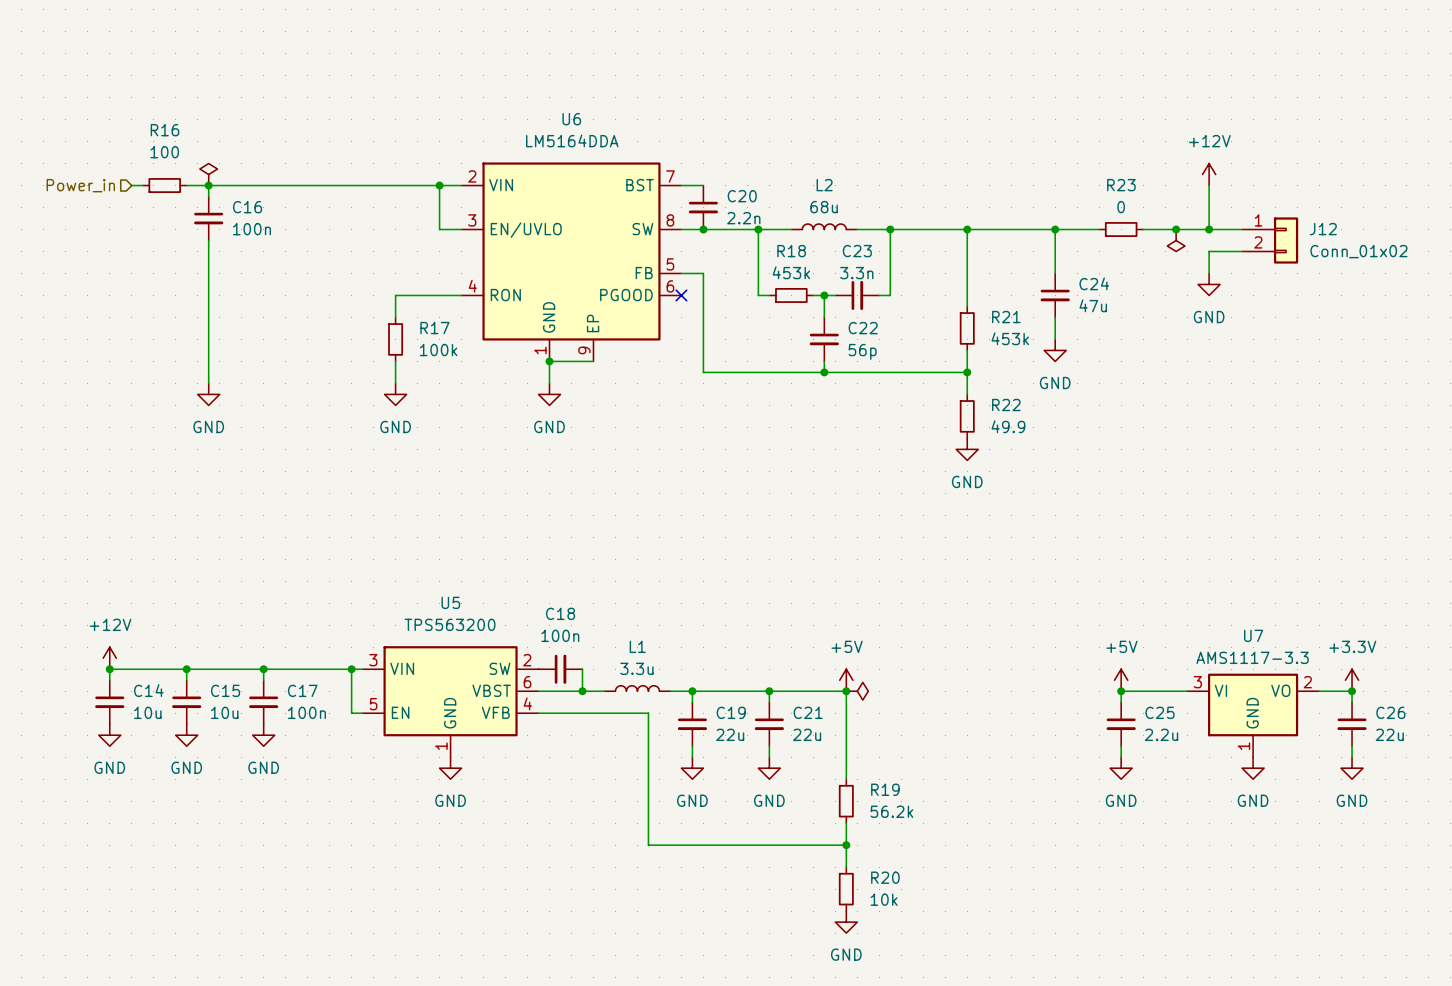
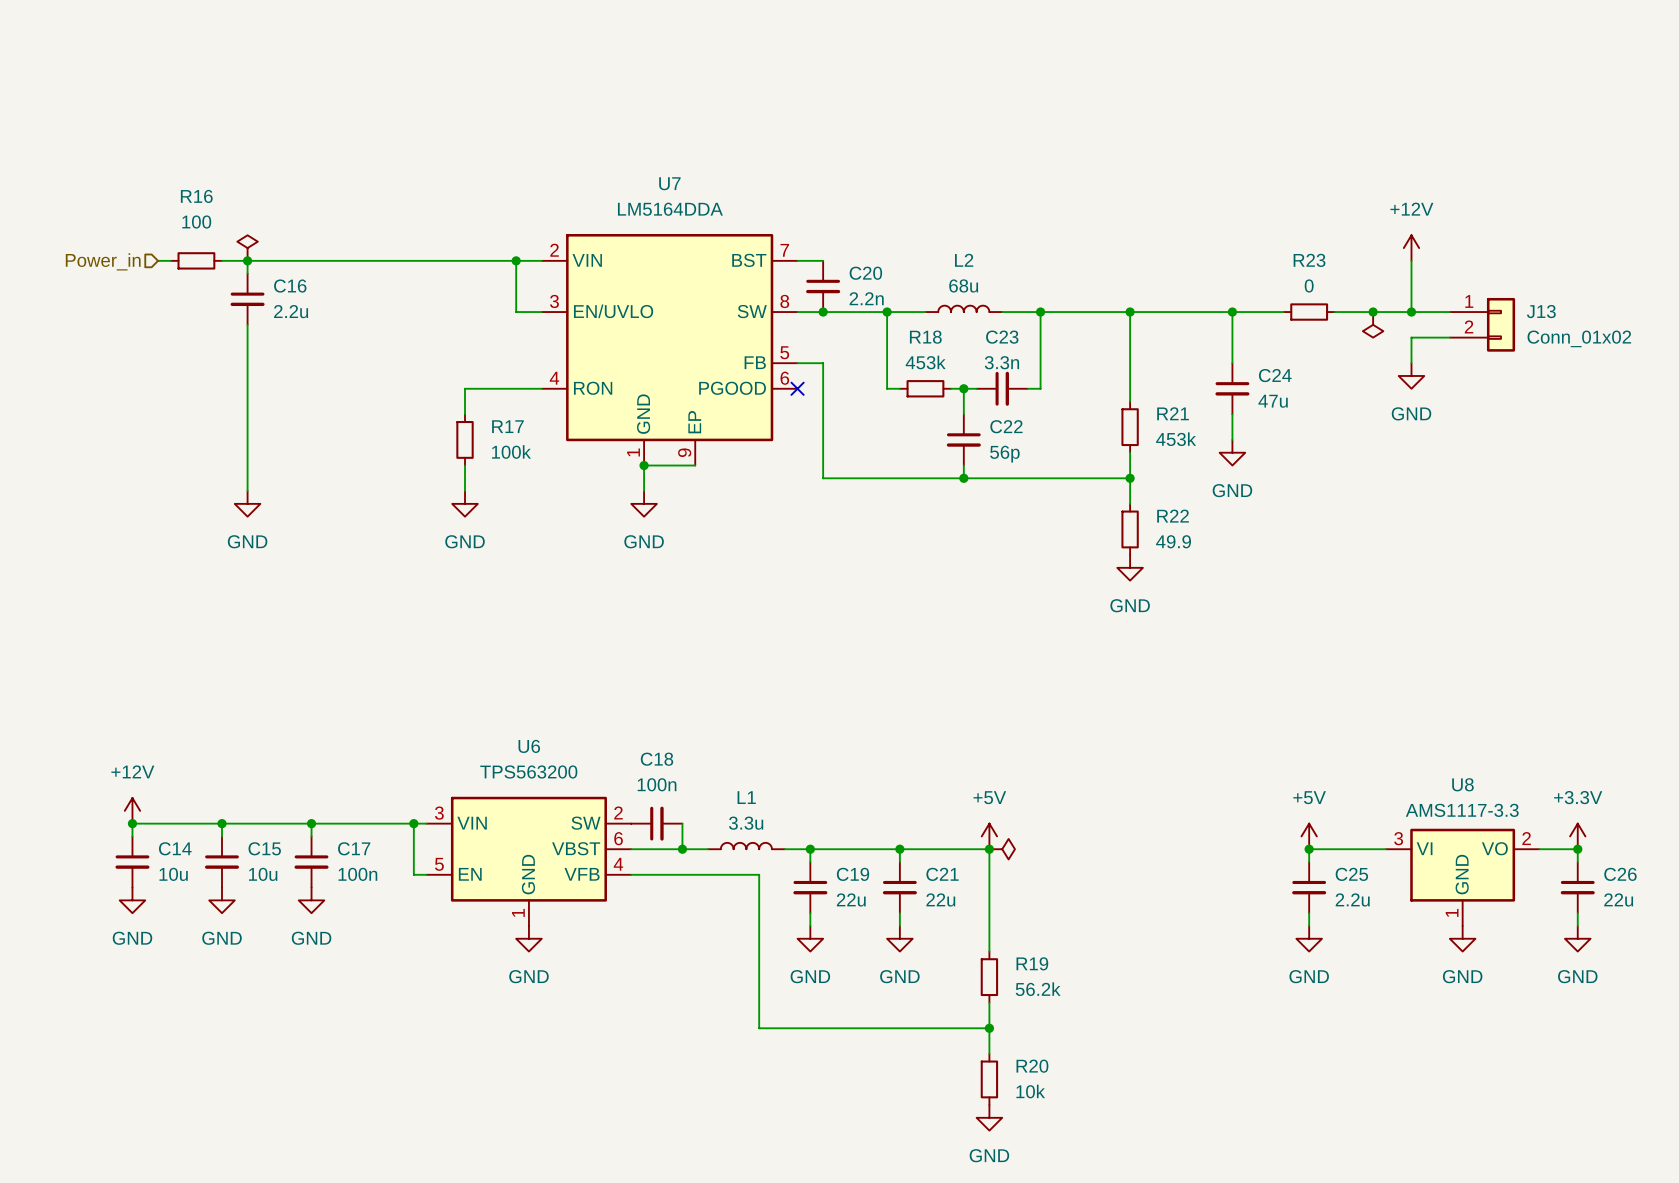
U6 name: U6 (571, 119) -> U7 (669, 183)
C16 value: 100n (251, 229) -> 2.2u (291, 311)
J12 name: J12 (1323, 229) -> J13 (1541, 311)
U5 name: U5 (450, 602) -> U6 (529, 746)
U7 name: U7 (1253, 635) -> U8 (1462, 784)

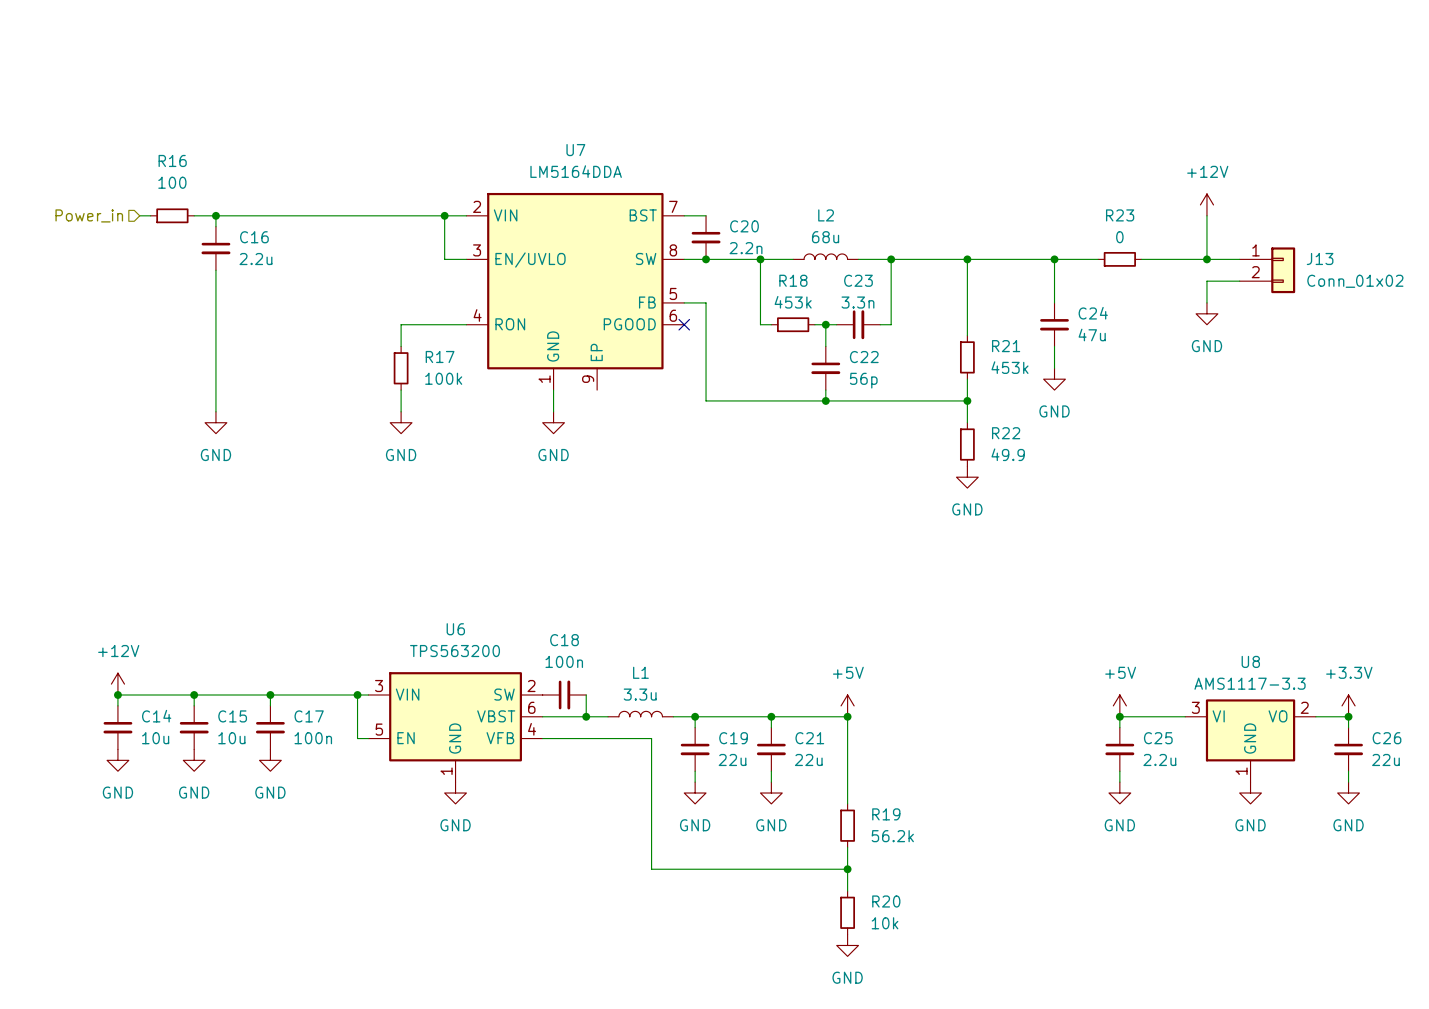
power symbol: (247, 248) -> none
junction: (1373, 312) -> none
power symbol: (1373, 324) -> none
wire: (644, 465) (695, 465) -> none
junction: (644, 465) -> none
power symbol: (1002, 849) -> none

